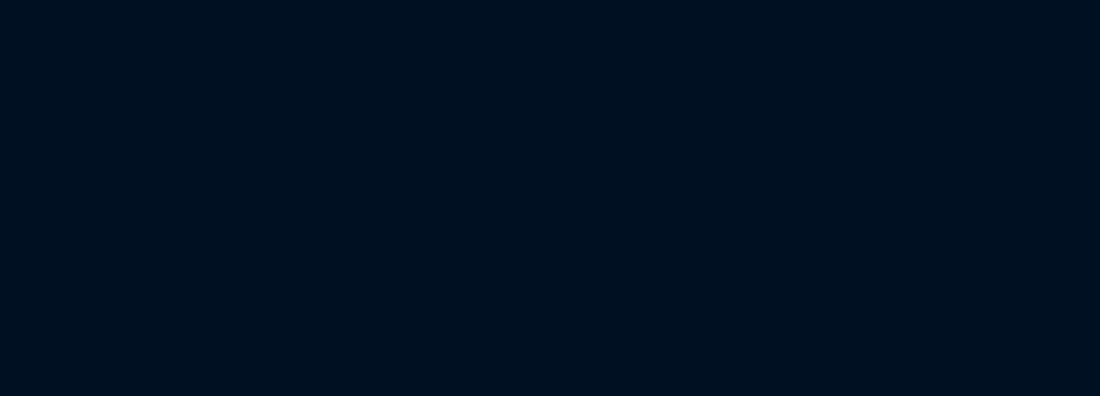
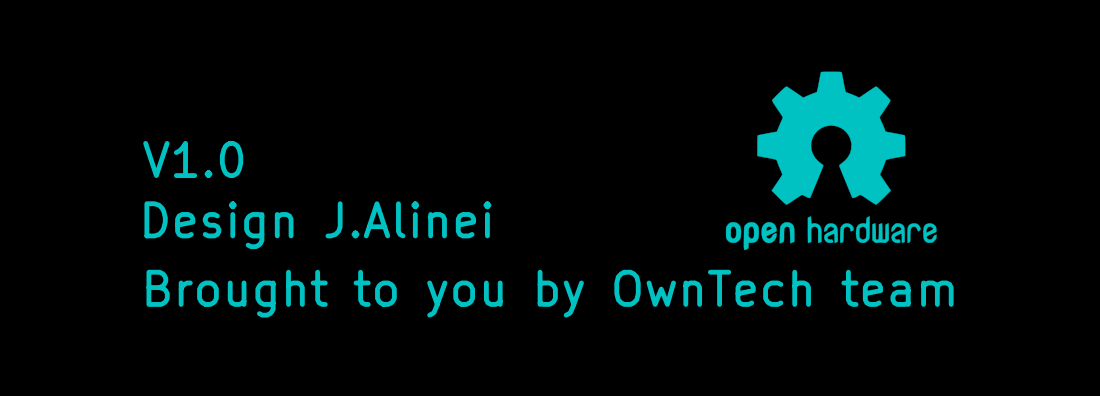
drawing: none -> [725, 71, 937, 251]
text: none -> V1.0 (193, 159)
text: none -> Design J.Alinei (317, 225)
text: none -> Brought to you by OwnTech team (550, 293)

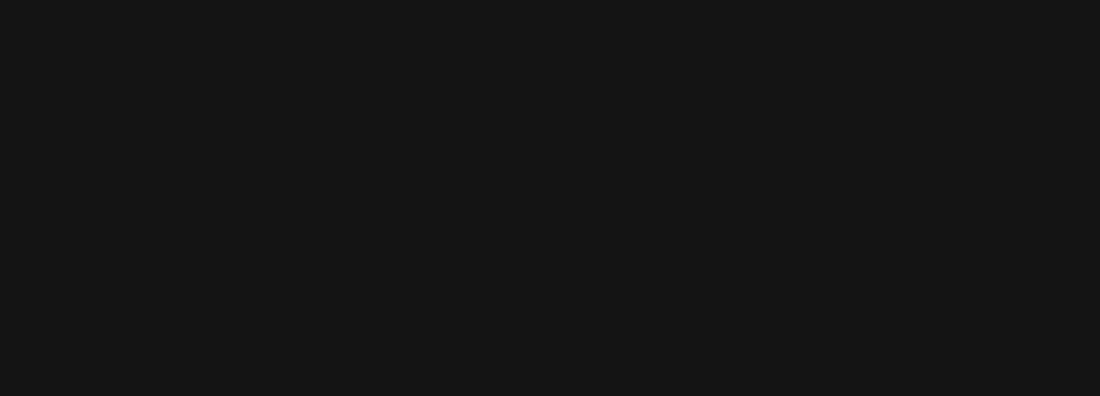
drawing: [725, 71, 937, 251] -> none
text: V1.0 (193, 159) -> none
text: Design J.Alinei (317, 225) -> none
text: Brought to you by OwnTech team (550, 293) -> none

